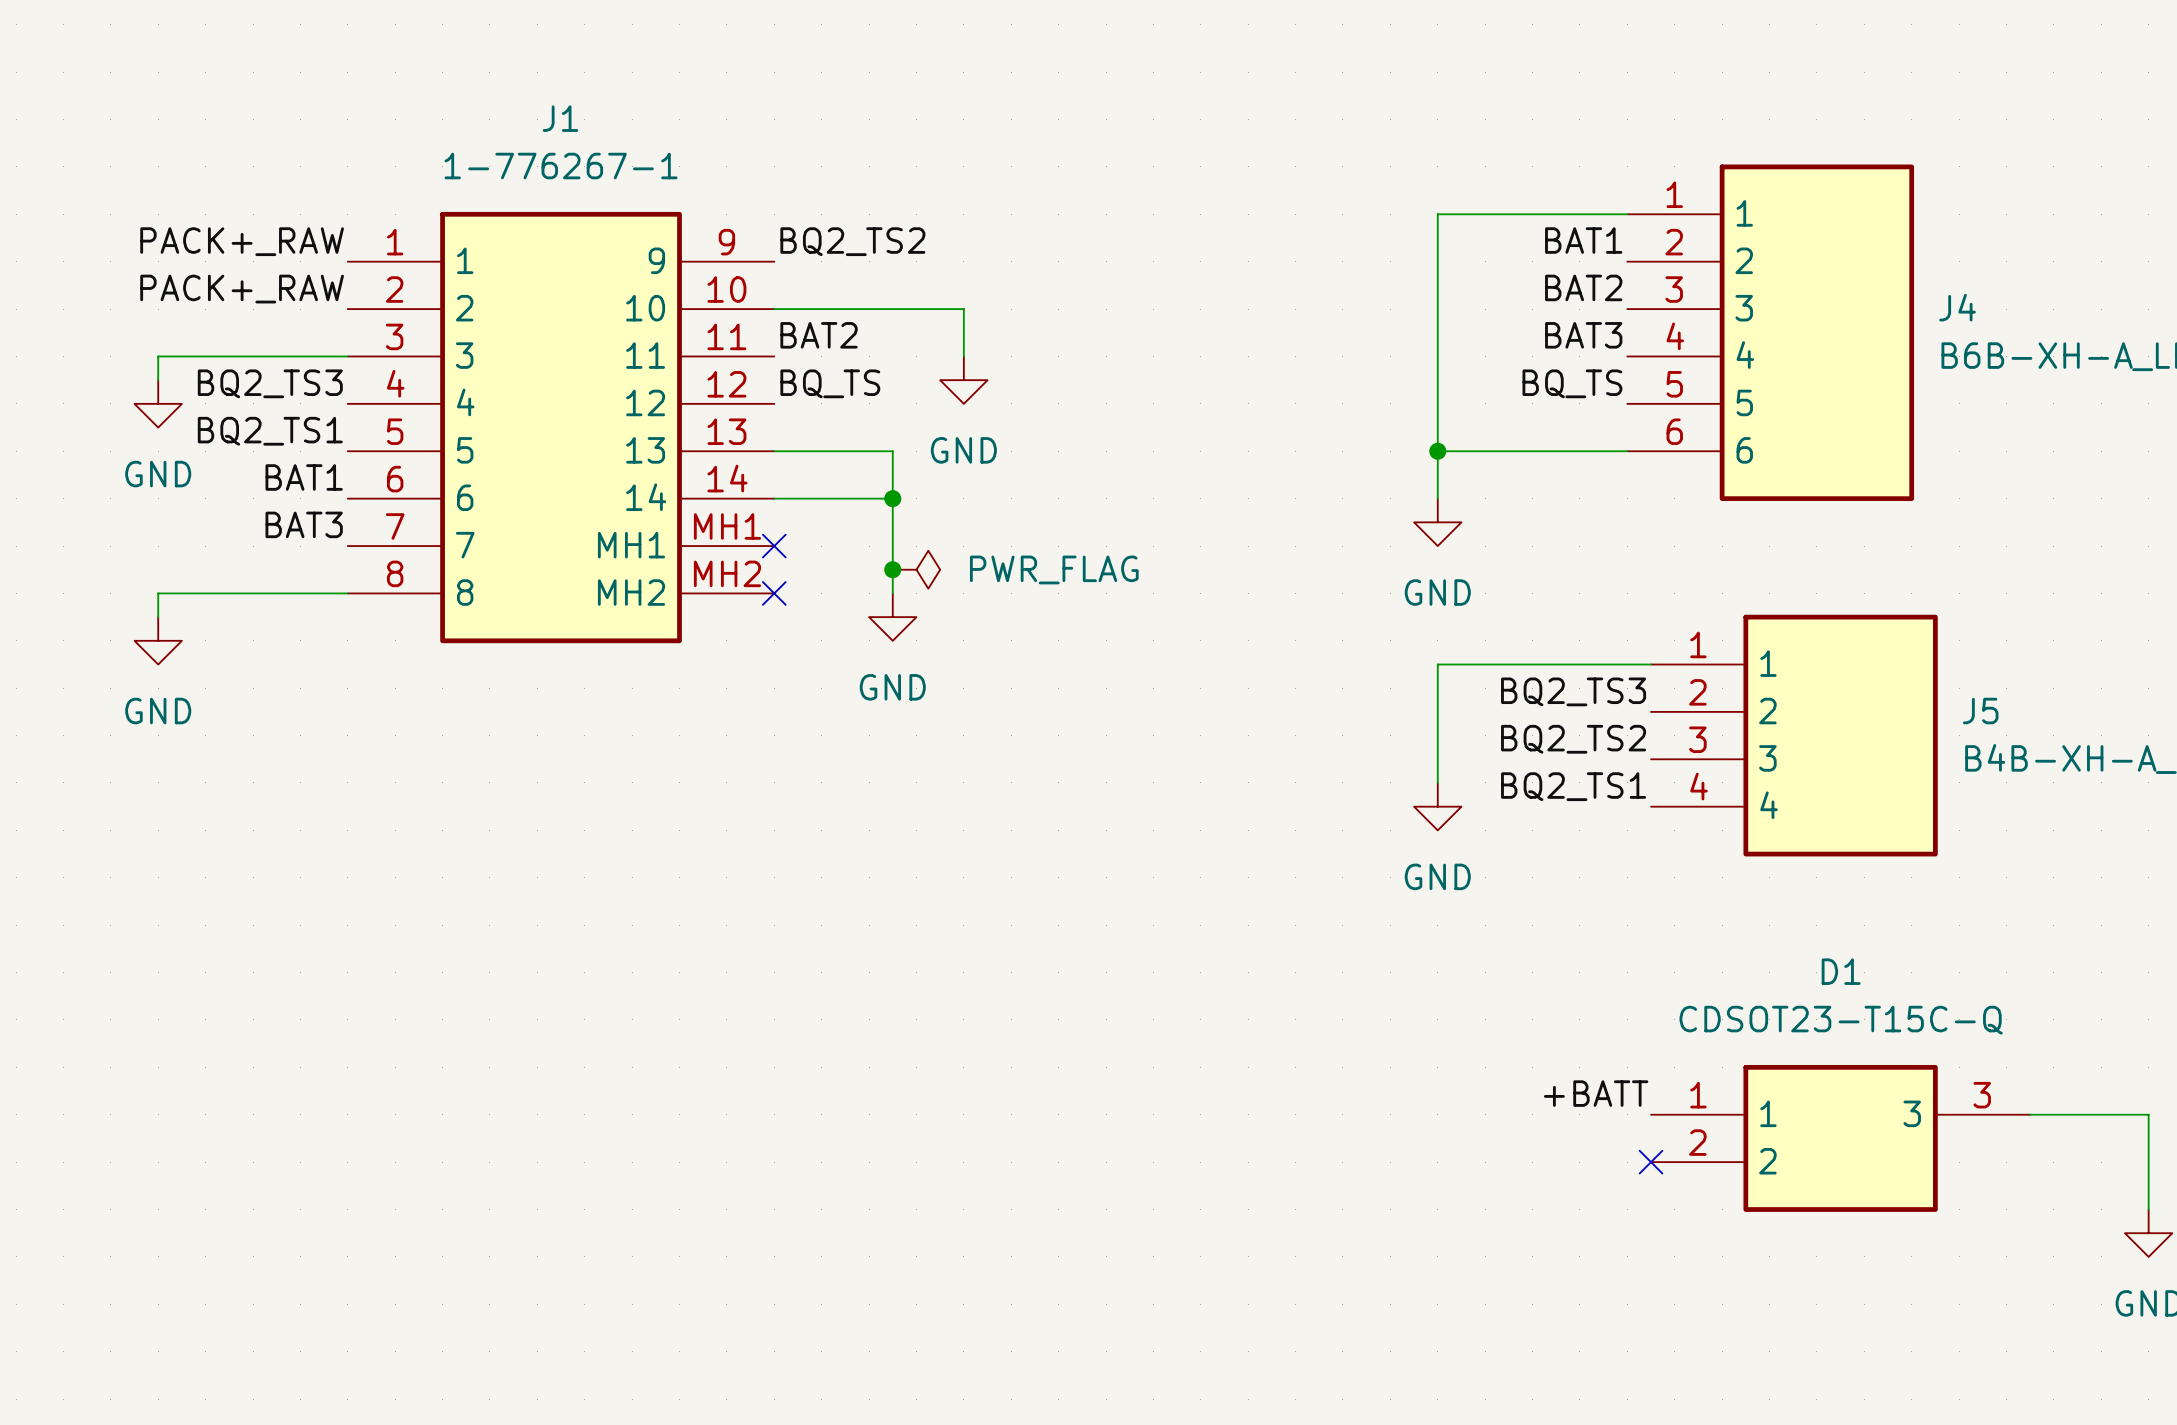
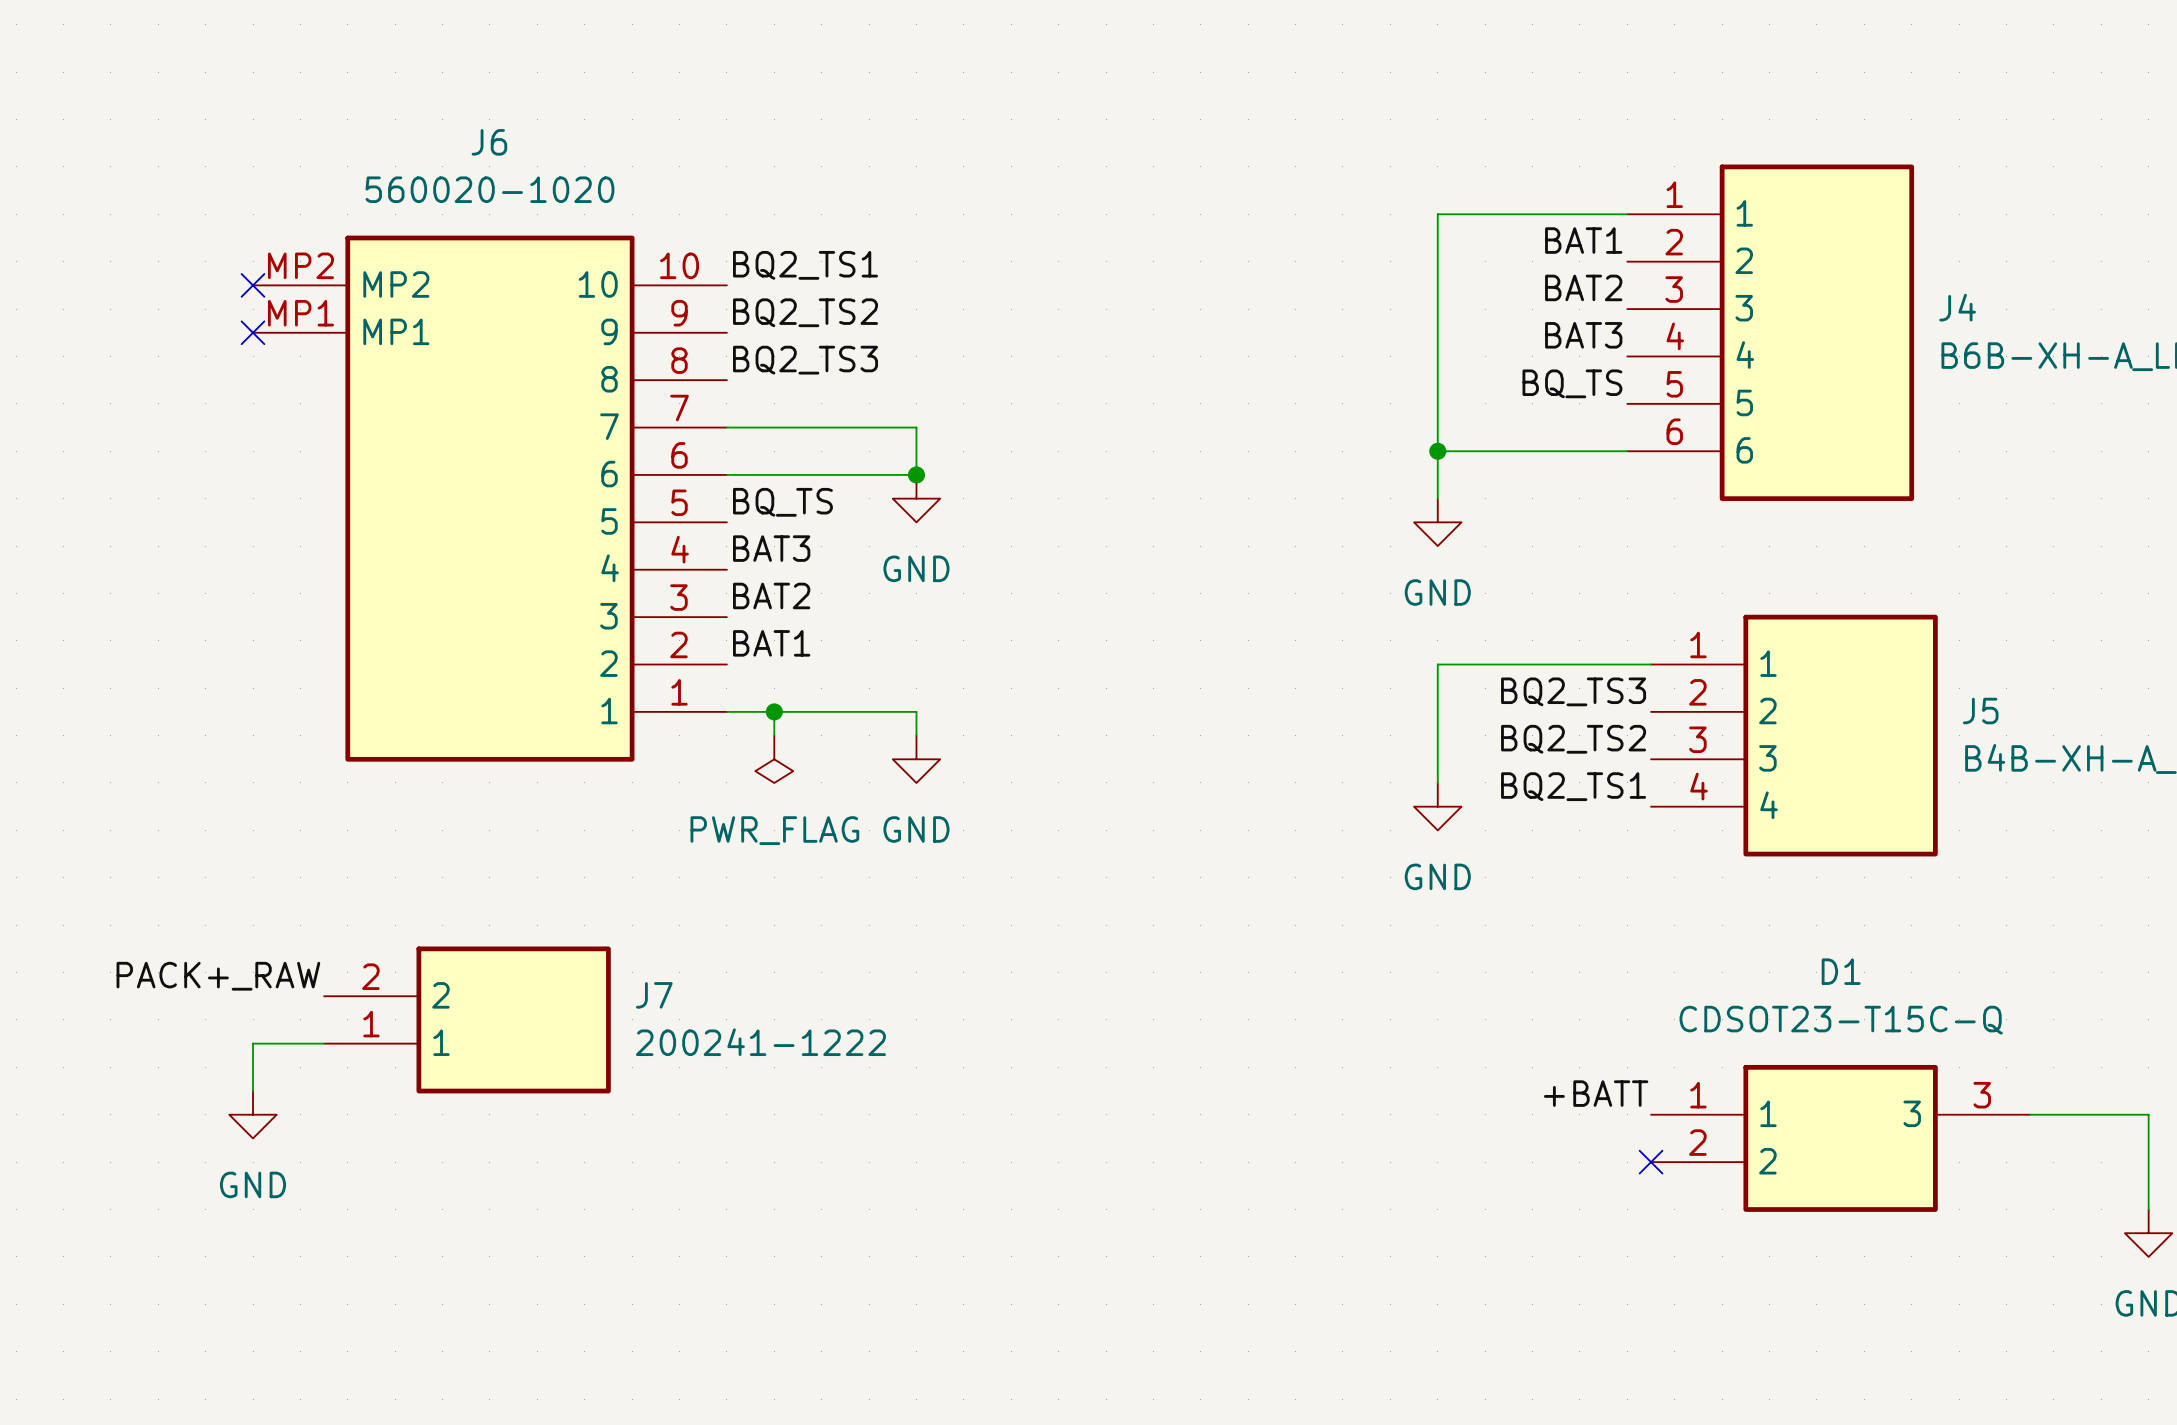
label: PACK+_RAW (242, 241) -> none
label position: BQ2_TS2 (852, 241) -> BQ2_TS2 (805, 312)
no-connect mark: none -> (253, 285)
label: PACK+_RAW (242, 289) -> none
wire: (774, 309) (963, 309) (963, 356) -> none
no-connect mark: none -> (253, 332)
label position: BAT2 (819, 335) -> BAT2 (771, 595)
wire: (347, 356) (158, 356) (158, 380) -> none
power symbol: GND (963, 380) -> none
label position: BQ2_TS3 (270, 383) -> BQ2_TS3 (805, 360)
label position: BQ_TS (830, 383) -> BQ_TS (782, 502)
power symbol: GND (158, 403) -> none
J1: 1-776267-1 (561, 427) -> none
wire: none -> (726, 427) (916, 427) (916, 474) (726, 474)
label position: BQ2_TS1 (270, 431) -> BQ2_TS1 (805, 265)
wire: (774, 451) (892, 451) (892, 593) -> none
label position: BAT1 (304, 477) -> BAT1 (771, 643)
J6: none -> 560020-1020 (489, 498)
wire: (774, 498) (892, 498) -> none
junction position: (892, 498) -> (916, 474)
power symbol: none -> GND (916, 498)
label position: BAT3 (304, 524) -> BAT3 (771, 548)
no-connect mark: (774, 546) -> none
junction: (892, 569) -> none
power symbol rotation: 0° (916, 569) -> 90° clockwise (774, 759)
power symbol position: PWR_FLAG (916, 569) -> PWR_FLAG (774, 759)
power symbol text position: PWR_FLAG (1054, 569) -> PWR_FLAG (774, 830)
wire: (347, 593) (158, 593) (158, 617) -> none
no-connect mark: (774, 593) -> none
power symbol: GND (892, 617) -> none
power symbol: GND (158, 640) -> none
wire: none -> (726, 711) (916, 711) (916, 735)
wire: none -> (774, 711) (774, 735)
junction: none -> (774, 711)
power symbol: none -> GND (916, 759)
label: none -> PACK+_RAW (218, 976)
J7: none -> 200241-1222 (467, 1019)
wire: none -> (324, 1043) (253, 1043) (253, 1091)
power symbol: none -> GND (253, 1114)

